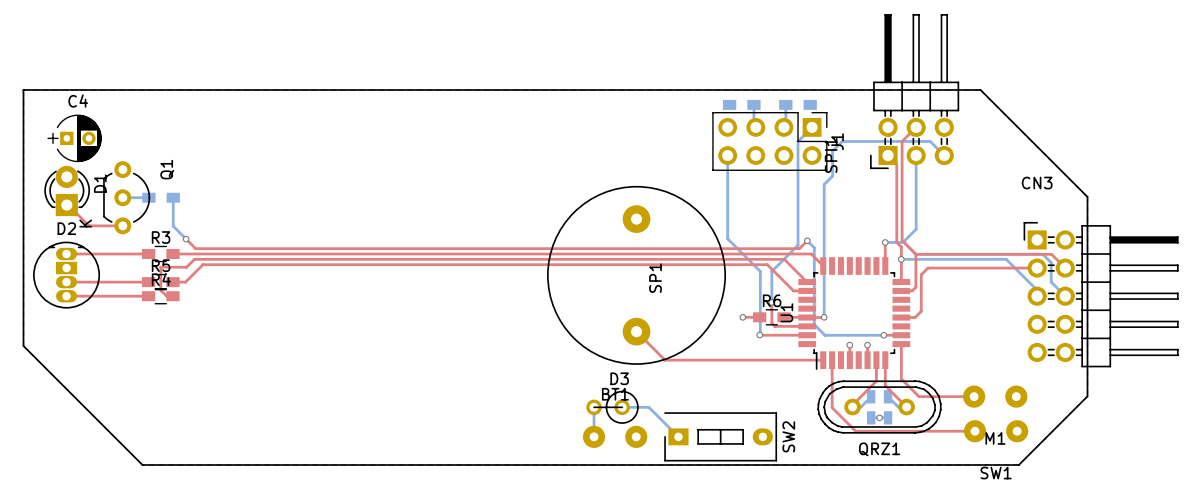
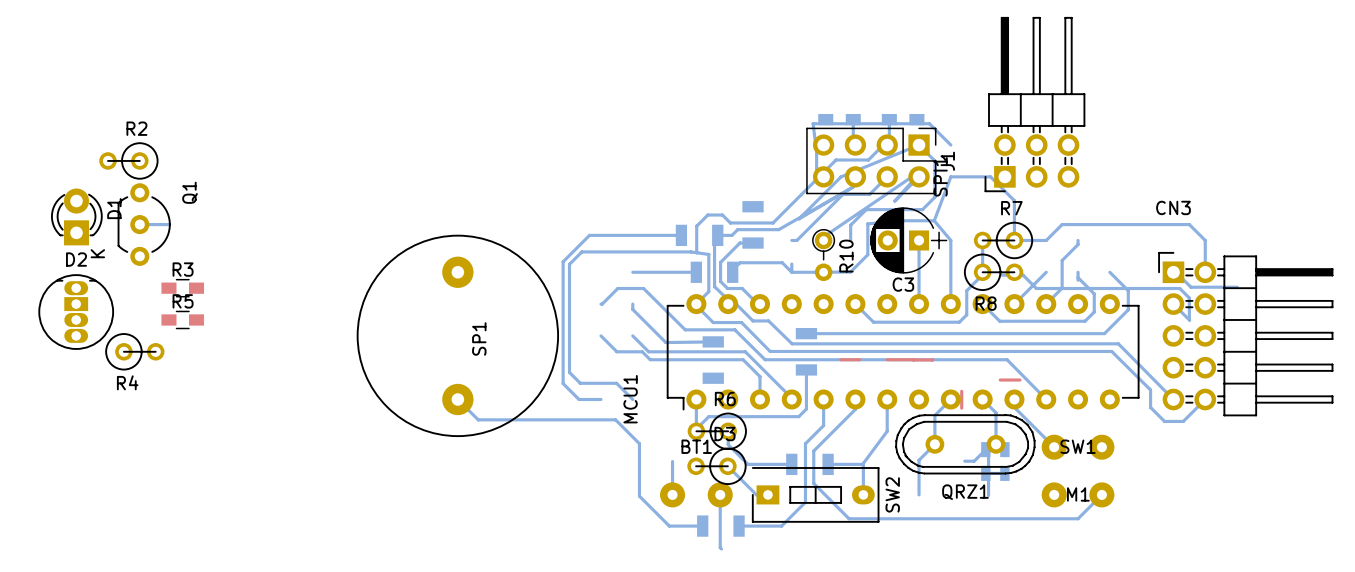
board edge: (23, 89) (980, 89) (1087, 196) (1087, 396) (1018, 465) (142, 465) (23, 345) (23, 166) -> none
board edge: (23, 89) (23, 166) -> none
bottom track: none -> (883, 145) (868, 160) (836, 160) (773, 222) (730, 222) (722, 215) (707, 215) (696, 226) (696, 252)
bottom track: (812, 127) (798, 141) (798, 245) (771, 271) (771, 302) -> none
bottom track: none -> (950, 145) (929, 123) (813, 123) (816, 152) (816, 174)
top track: (916, 127) (902, 141) (902, 240) (915, 254) -> none
C4: (74, 138) -> none
R2: none -> (128, 160)
bottom track: (727, 155) (727, 208) -> (919, 176) (894, 201) (923, 169) (823, 236)
bottom track: none -> (887, 176) (869, 194) (843, 194) (796, 240) (791, 240)
top track: (888, 155) (896, 164) (896, 242) (901, 247) (901, 282) -> none
bottom track: (916, 155) (916, 229) (902, 242) -> none
bottom track: (944, 155) (930, 141) (842, 141) (832, 151) (832, 176) (824, 184) (824, 317) -> none
bottom track: none -> (934, 220) (898, 220) (867, 223) (867, 254) (850, 271) (791, 272)
bottom track: none -> (934, 220) (950, 240) (950, 304)
bottom track: none -> (934, 220) (950, 176) (990, 176) (1014, 200) (1014, 240) (1046, 240) (1062, 224) (1189, 224) (1205, 240) (1205, 272)
part: (161, 197) -> none
bottom track: (173, 197) (173, 226) (186, 239) -> none
part: none -> (753, 224)
bottom track: none -> (714, 232) (714, 286) (728, 299) (728, 304) (736, 304) (753, 320) (768, 320) (792, 343) (1118, 343) (1173, 399)
top track: (66, 205) (89, 225) (122, 225) -> none
bottom track: none -> (681, 235) (589, 235) (563, 261) (563, 383) (579, 399) (600, 399)
part: none -> (699, 235)
bottom track: none -> (717, 235) (732, 235) (737, 229) (778, 229) (853, 187) (799, 218) (841, 176) (919, 145) (934, 160) (934, 197) (922, 209) (866, 209) (850, 225) (850, 240)
bottom track: (727, 211) (727, 238) (760, 271) (759, 335) -> none
C3: none -> (908, 240)
bottom track: none -> (919, 240) (919, 304)
bottom track: none -> (982, 240) (982, 274) (966, 290) (966, 314) (959, 322) (873, 322) (855, 304)
R7: none -> (1003, 240)
bottom track: none -> (1078, 240) (1078, 244) (1062, 260) (1062, 288) (1046, 304)
bottom track: none -> (754, 243) (739, 243) (720, 262) (720, 281) (727, 288) (742, 288) (757, 304) (760, 303)
R10: none -> (823, 255)
bottom track: none -> (791, 264) (791, 272)
bottom track: none -> (732, 270) (739, 262) (782, 262) (791, 272)
top track: (186, 239) (195, 248) (799, 248) (807, 240) -> none
via: (186, 239) -> none
bottom track: none -> (632, 272) (696, 272)
part: none -> (714, 272)
R8: none -> (993, 272)
bottom track: none -> (1046, 272) (1014, 304)
bottom track: none -> (1078, 272) (1078, 280)
bottom track: none -> (1109, 272) (1128, 290) (1128, 309) (1104, 333) (806, 333)
bottom track: none -> (1173, 272) (1176, 272) (1190, 287) (1237, 287)
bottom track: (807, 240) (814, 247) (814, 324) (825, 335) (883, 335) -> none
via: (807, 240) -> none
top track: (885, 242) (885, 266) -> none
via: (885, 242) -> none
bottom track: none -> (1078, 277) (1094, 293) (1094, 312) (1085, 321) (999, 321) (982, 304)
top track: (66, 254) (148, 254) -> none
top track: (172, 254) (811, 254) (823, 266) -> none
top track: (915, 254) (1051, 254) (1065, 268) -> none
top track: (915, 254) (915, 287) (912, 290) (901, 290) -> none
bottom track: (901, 259) (1006, 259) (1037, 290) (1037, 296) -> none
via: (901, 259) -> none
bottom track: none -> (600, 304) (617, 288) (643, 288) (685, 329) (734, 329) (765, 359) (1007, 359) (1046, 399)
bottom track: none -> (632, 304) (632, 309) (665, 342) (713, 341)
top track: (1037, 268) (927, 268) (921, 274) (921, 311) (915, 317) (901, 317) -> none
SP1 position: (636, 275) -> (457, 335)
R4 name position: R4 (161, 279) -> R4 (127, 382)
top track: (66, 282) (148, 282) -> none
top track: (172, 282) (185, 282) (202, 264) (767, 264) (793, 290) (807, 290) -> none
top track: (807, 282) (784, 259) (194, 259) (186, 267) (160, 267) (160, 290) (166, 296) (172, 296) -> none
bottom track: (1051, 282) (1065, 296) -> (1189, 319) (1173, 304)
R4 footprint: [141, 288, 180, 305] -> [105, 333, 165, 371]
top track: (66, 296) (148, 296) -> none
bottom track: none -> (600, 335) (616, 351) (642, 351) (650, 359) (743, 359) (760, 376) (760, 399)
bottom track: none -> (632, 335) (648, 351) (745, 351) (791, 399)
top track: (771, 302) (771, 323) (775, 326) (807, 326) -> none
via: (771, 302) -> none
R6 footprint: [753, 309, 791, 326] -> [687, 412, 747, 451]
part: none -> (806, 351)
MCU1: none -> (903, 352)
U1: (854, 313) -> none
part: none -> (713, 360)
via: (742, 317) -> none
via: (824, 317) -> none
bottom track: none -> (806, 369) (806, 409) (798, 416) (708, 416) (696, 429)
top track: (636, 331) (665, 360) (823, 360) -> none
top track: (759, 335) (807, 335) -> none
via: (759, 335) -> none
via: (883, 335) -> none
top track: (901, 344) (901, 379) (918, 396) (974, 396) -> none
via: (849, 345) -> none
via: (867, 345) -> none
bottom track: none -> (457, 399) (478, 419) (615, 419) (639, 443) (639, 496) (669, 526) (702, 526)
bottom track: none -> (632, 399) (616, 383) (580, 383) (569, 372) (569, 264) (581, 251) (690, 251) (708, 254) (708, 291) (696, 305) (713, 322) (741, 322) (770, 351) (1111, 351) (1150, 389) (1150, 407) (1164, 421) (1183, 421) (1205, 399)
bottom track: none -> (696, 399) (696, 431)
bottom track: none -> (823, 399) (823, 425) (805, 443) (805, 502) (781, 526) (739, 526)
bottom track: none -> (855, 399) (855, 409) (813, 451) (813, 483) (849, 518) (1078, 518) (1101, 494)
bottom track: none -> (887, 399) (887, 431) (863, 463) (863, 494)
bottom track: none -> (950, 399) (934, 415) (934, 444) (919, 460) (919, 494)
bottom track: none -> (982, 399) (996, 412) (996, 444) (988, 451) (988, 495)
bottom track: none -> (1014, 399) (1014, 407) (1054, 447)
top track: (832, 360) (832, 407) (855, 431) (974, 431) -> none
top track: (876, 360) (876, 381) (852, 405) (852, 407) (860, 407) -> none
top track: (885, 360) (885, 385) (906, 407) (900, 407) -> none
bottom track: none -> (728, 431) (728, 444) (747, 464) (791, 464)
bottom track: (888, 396) (898, 407) (906, 407) -> none
M1 position: (995, 396) -> (1078, 447)
QRZ1 position: (879, 406) -> (965, 444)
D3 position: (612, 407) -> (716, 466)
bottom track: (622, 407) (648, 407) (678, 436) -> (727, 466) (756, 494) (767, 494)
part: none -> (809, 464)
bottom track: none -> (828, 464) (863, 464)
via: (879, 417) -> none
SW1 position: (996, 431) -> (1078, 494)
bottom track: none -> (720, 494) (721, 548)
part: none -> (720, 526)
SW1 name position: SW1 (996, 473) -> SW1 (1078, 446)

